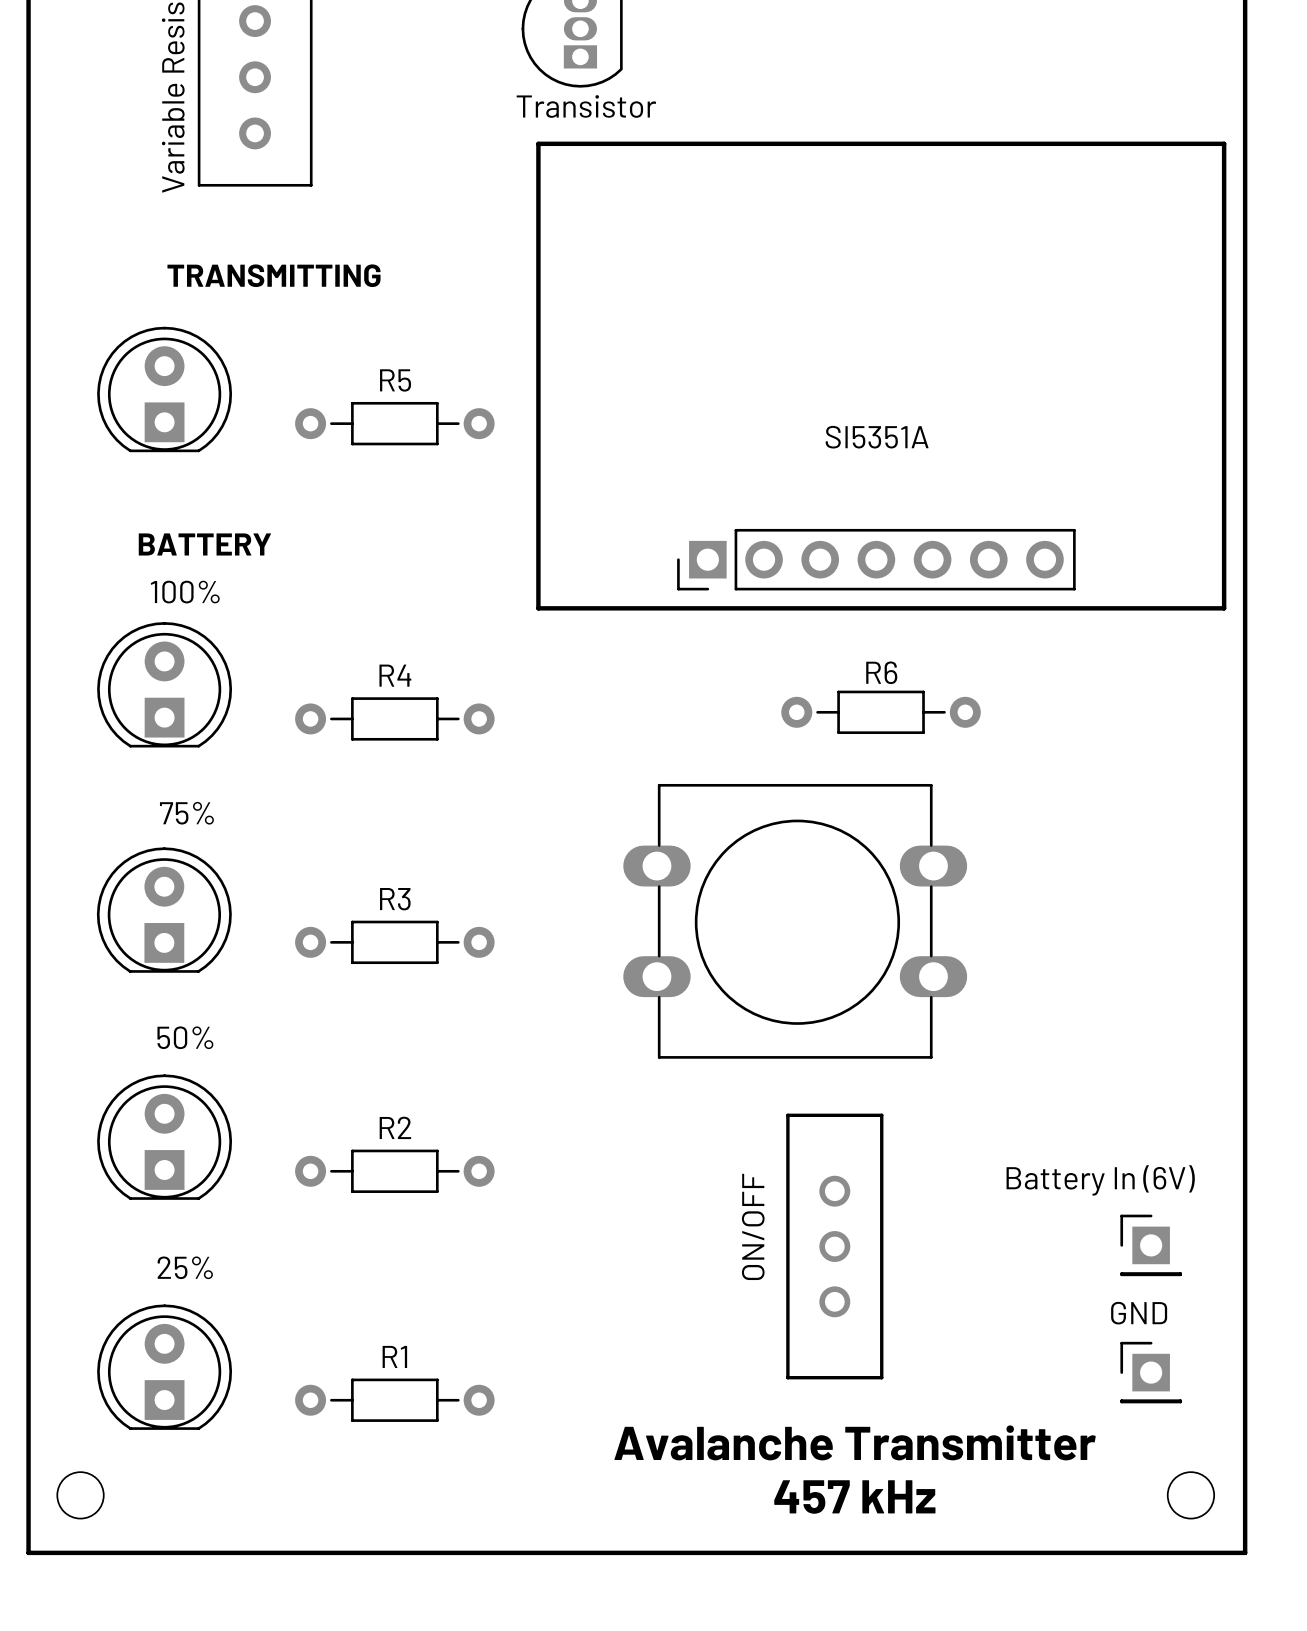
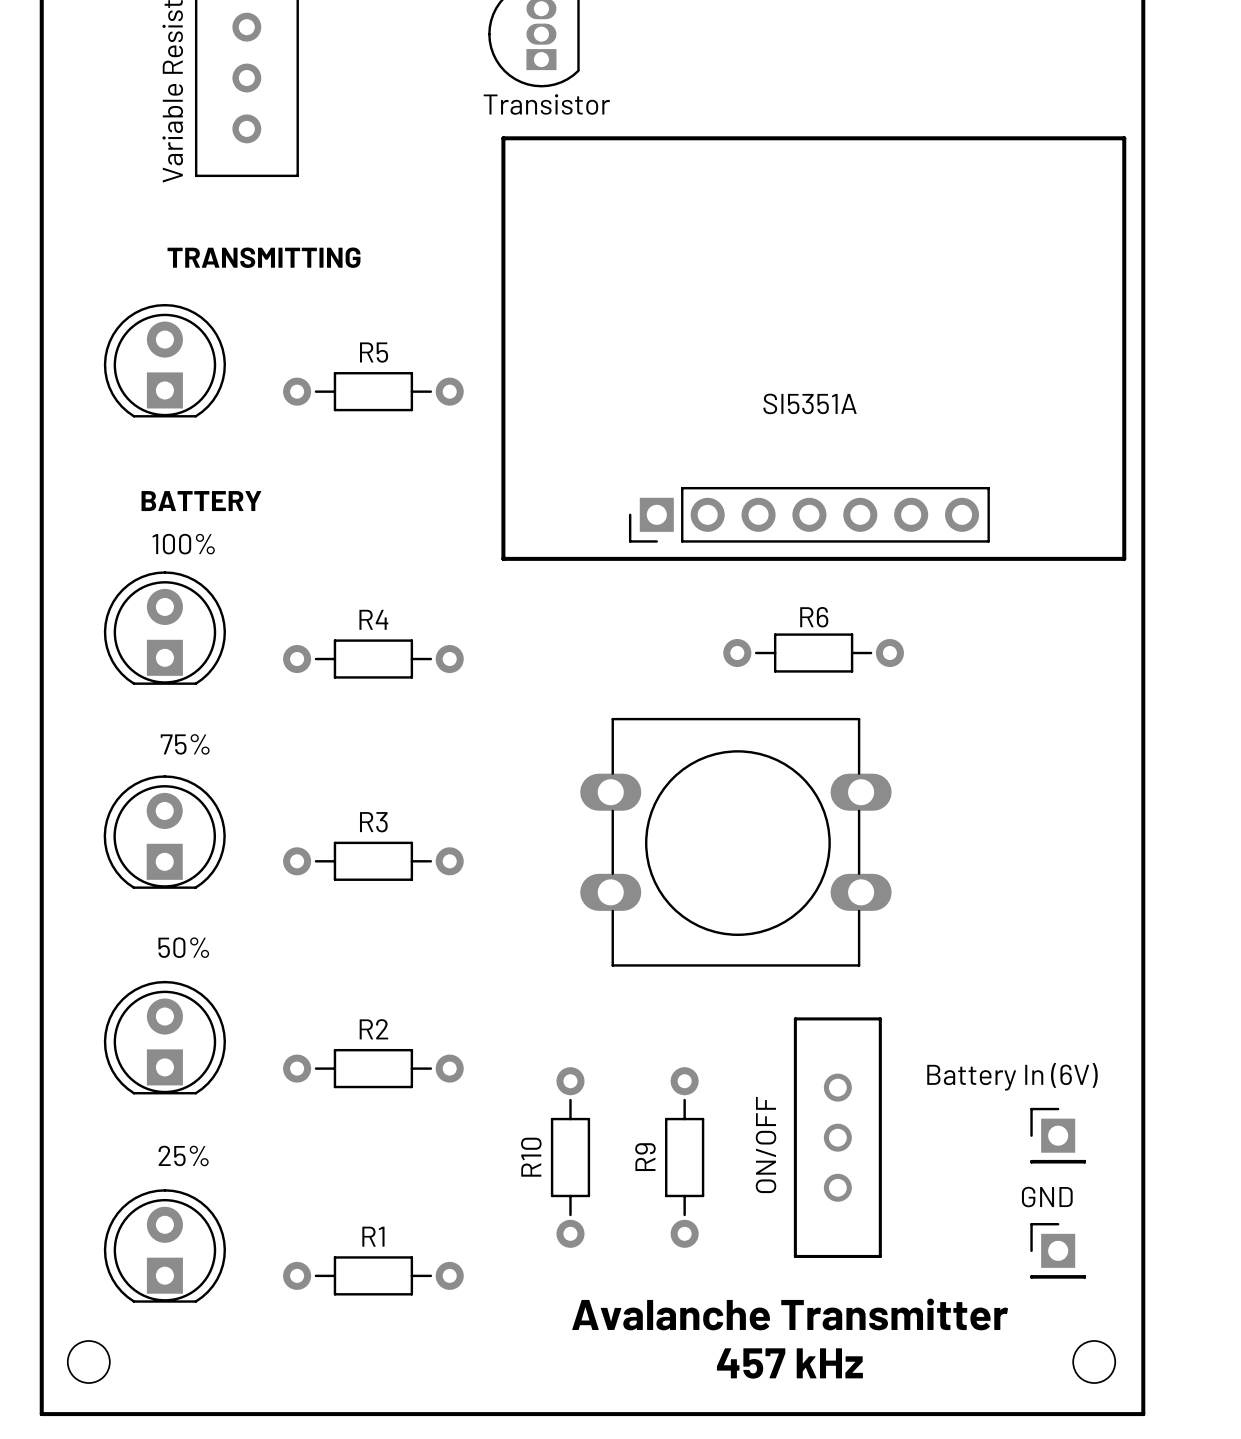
ON/OFF name position: ON/OFF (753, 1226) -> ON/OFF (766, 1144)
ON/OFF position: (834, 1246) -> (837, 1137)
R10: none -> (570, 1157)
R9: none -> (684, 1157)

